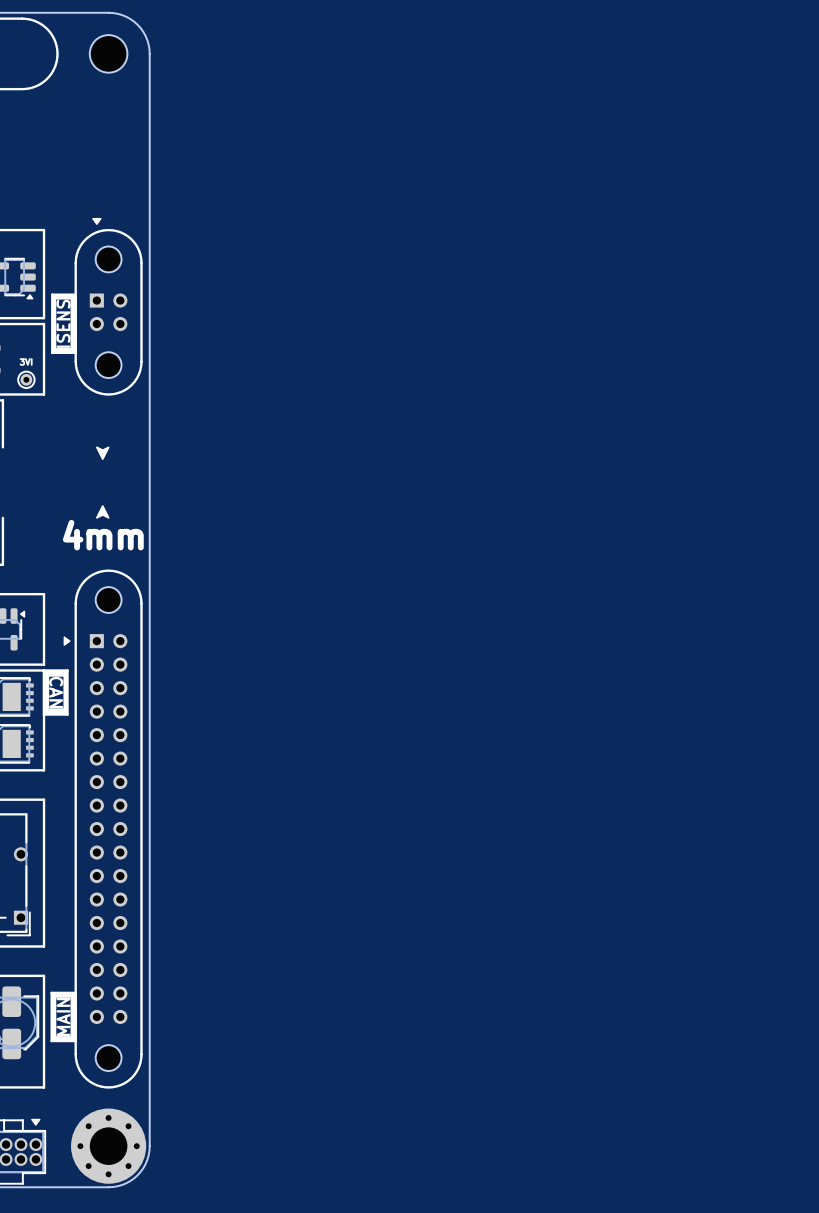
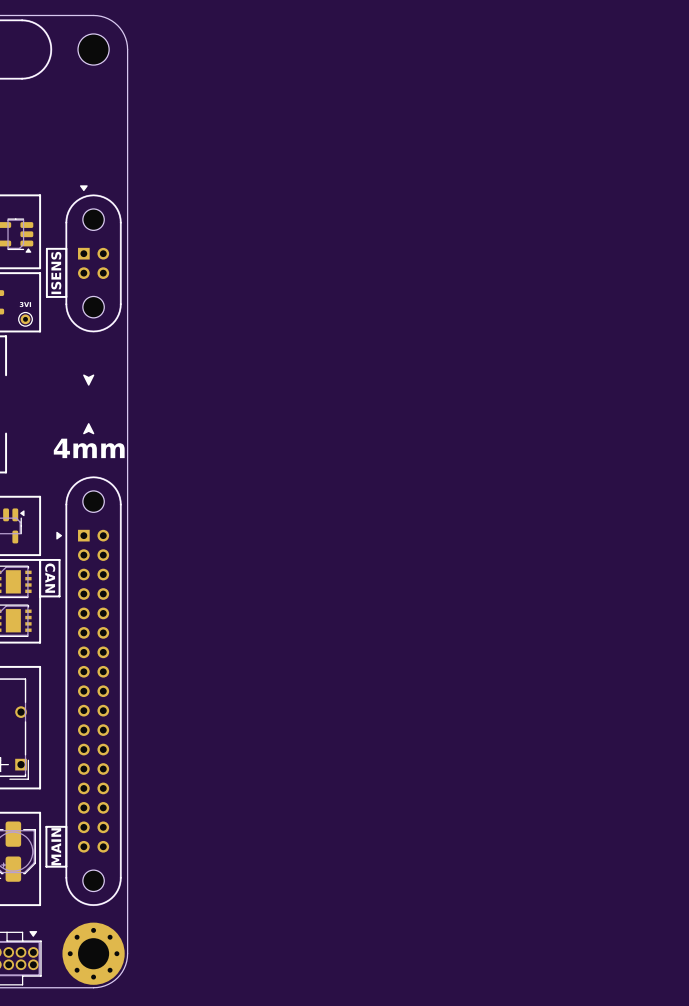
drawing: [52, 294, 76, 353] -> none
drawing: [44, 670, 68, 715] -> none
drawing: [51, 992, 76, 1042] -> none

